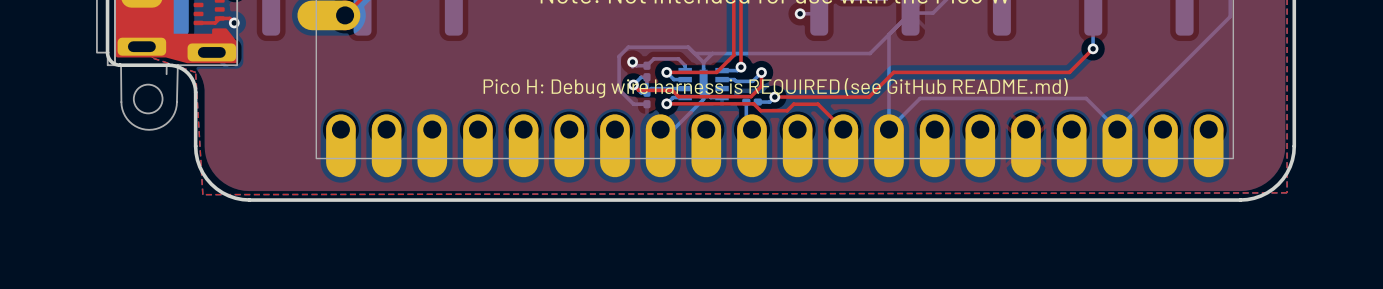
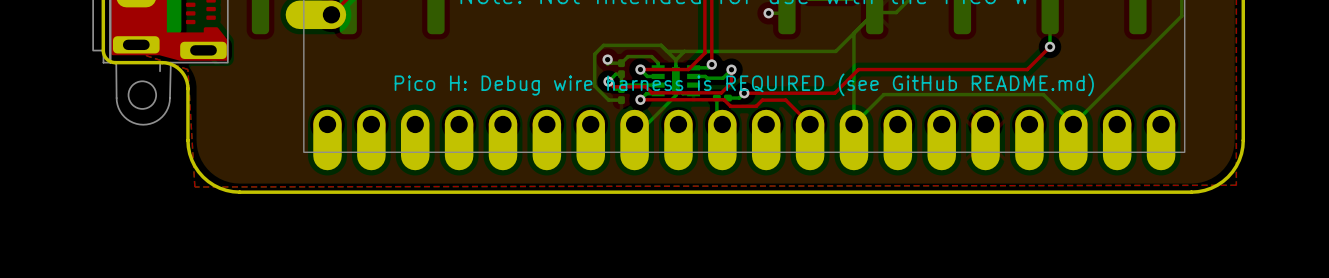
top track: (198, 22) (215, 22) (219, 18) (229, 18) (234, 22) -> none
via: (234, 22) -> none

